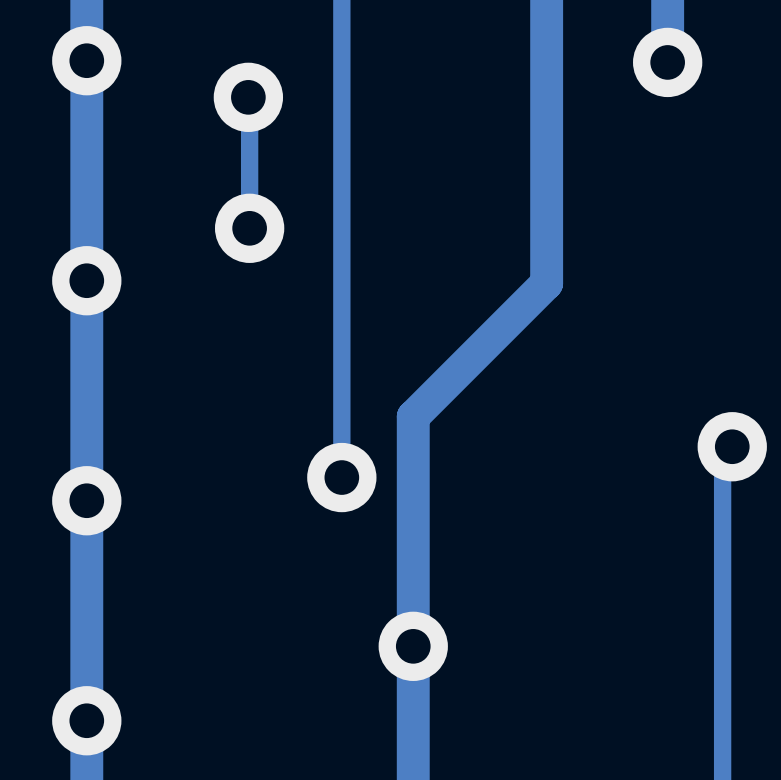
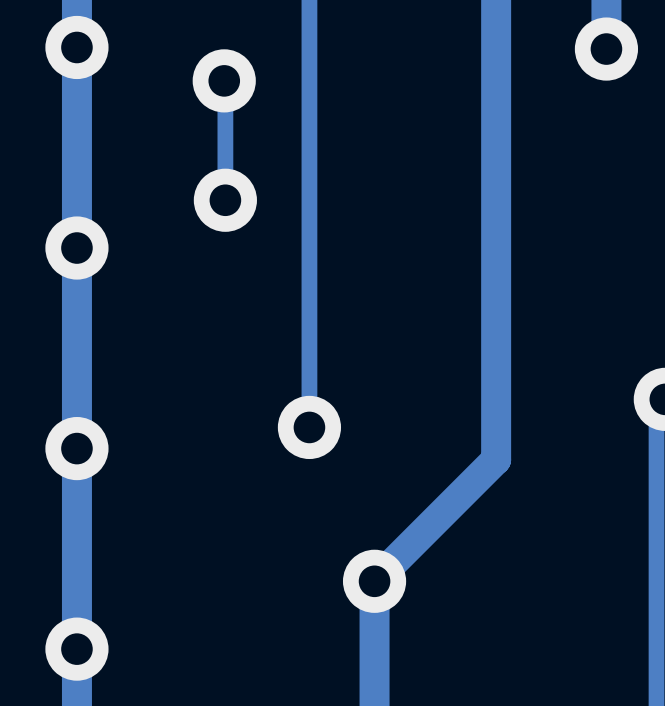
track: (546, 283) (413, 416) (413, 646) -> (496, 250) (496, 459) (374, 581)

